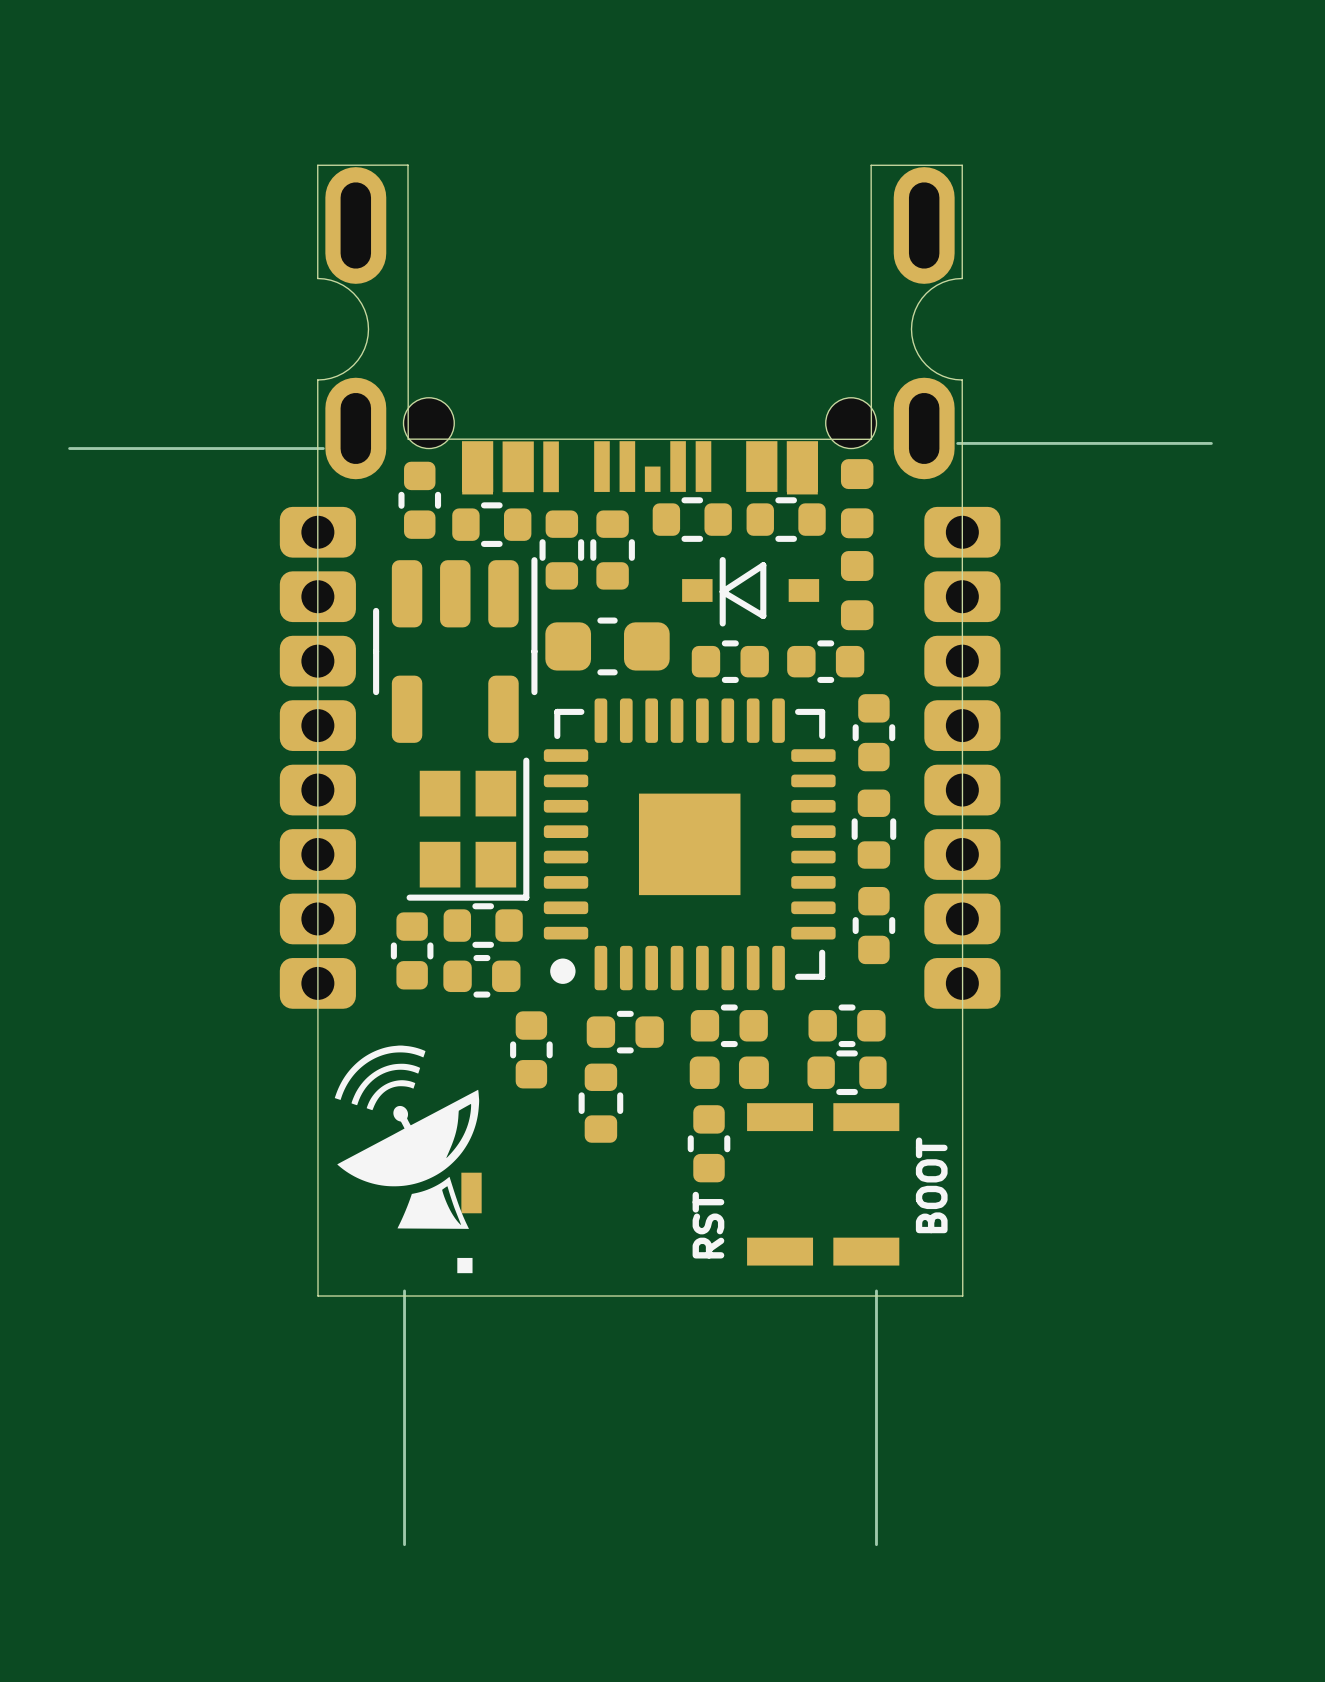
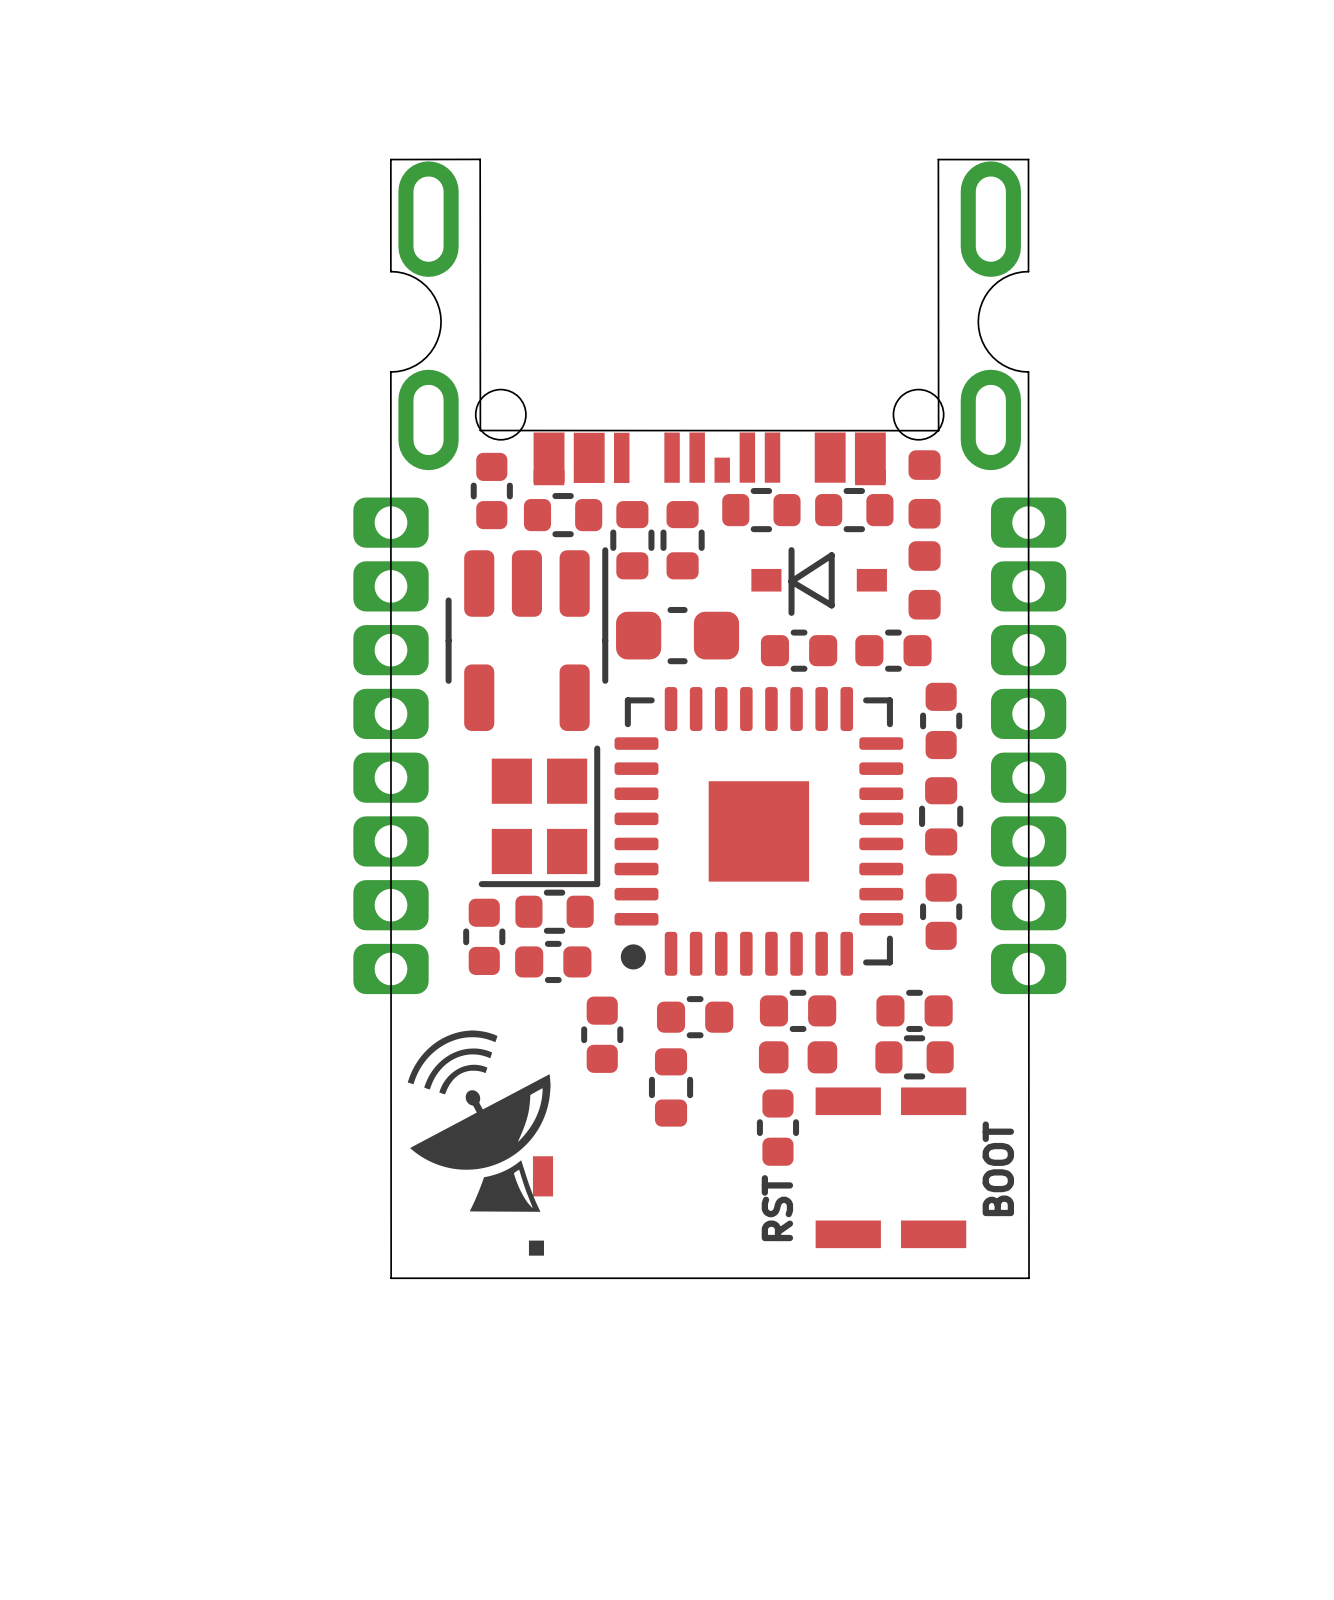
line: (957, 443) (1211, 443) -> none
line: (69, 448) (323, 448) -> none
line: (404, 1290) (404, 1544) -> none
line: (876, 1290) (876, 1544) -> none

